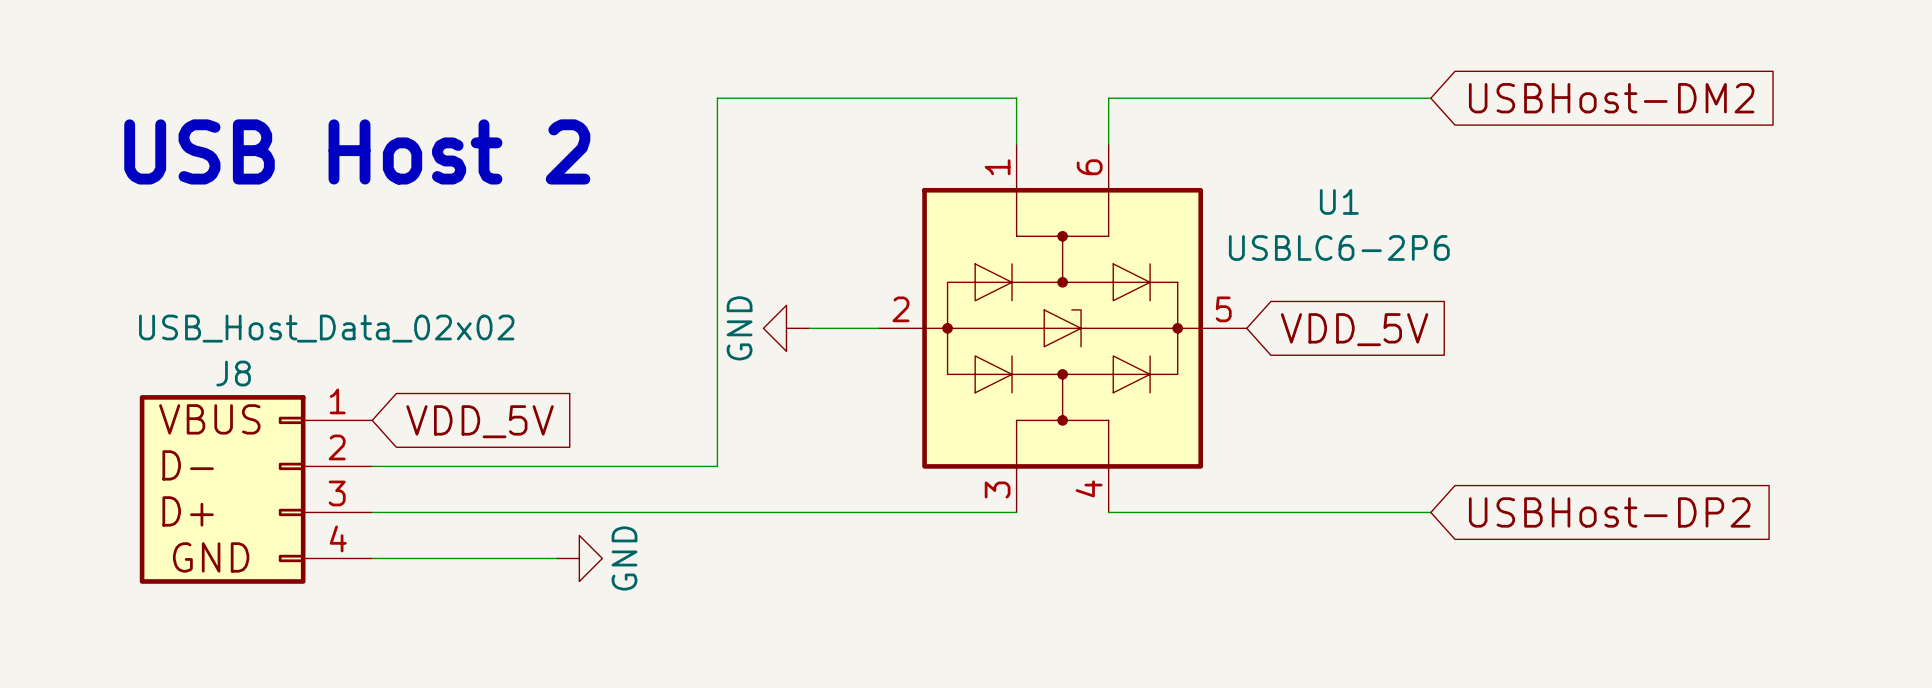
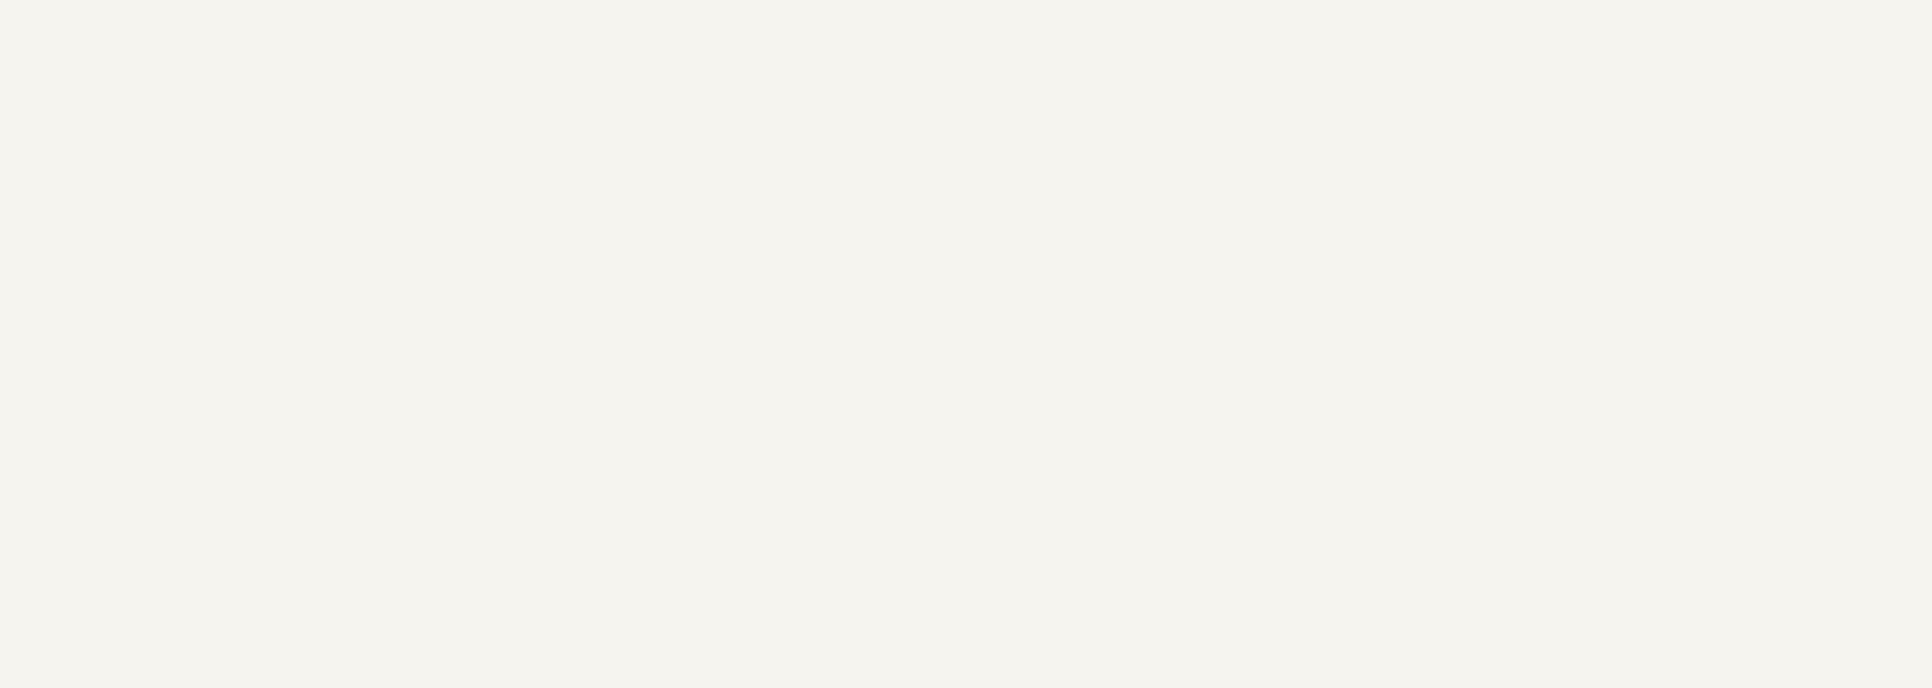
wire: (1430, 98) (1108, 98) (1108, 144) -> none
global label: USBHost-DM2 (1611, 98) -> none
wire: (1016, 144) (1016, 98) (717, 98) (717, 466) (372, 466) -> none
text: USB Host 2 (357, 151) -> none
power symbol: GND (786, 328) -> none
wire: (809, 328) (878, 328) -> none
U1: USBLC6-2P6 (1062, 328) -> none
global label: VDD_5V (1354, 329) -> none
global label: VDD_5V (480, 421) -> none
J8: USB_Host_Data_02x02 (256, 489) -> none
wire: (372, 512) (1016, 512) -> none
wire: (1108, 512) (1430, 512) -> none
global label: USBHost-DP2 (1609, 512) -> none
wire: (372, 558) (556, 558) -> none
power symbol: GND (579, 558) -> none

